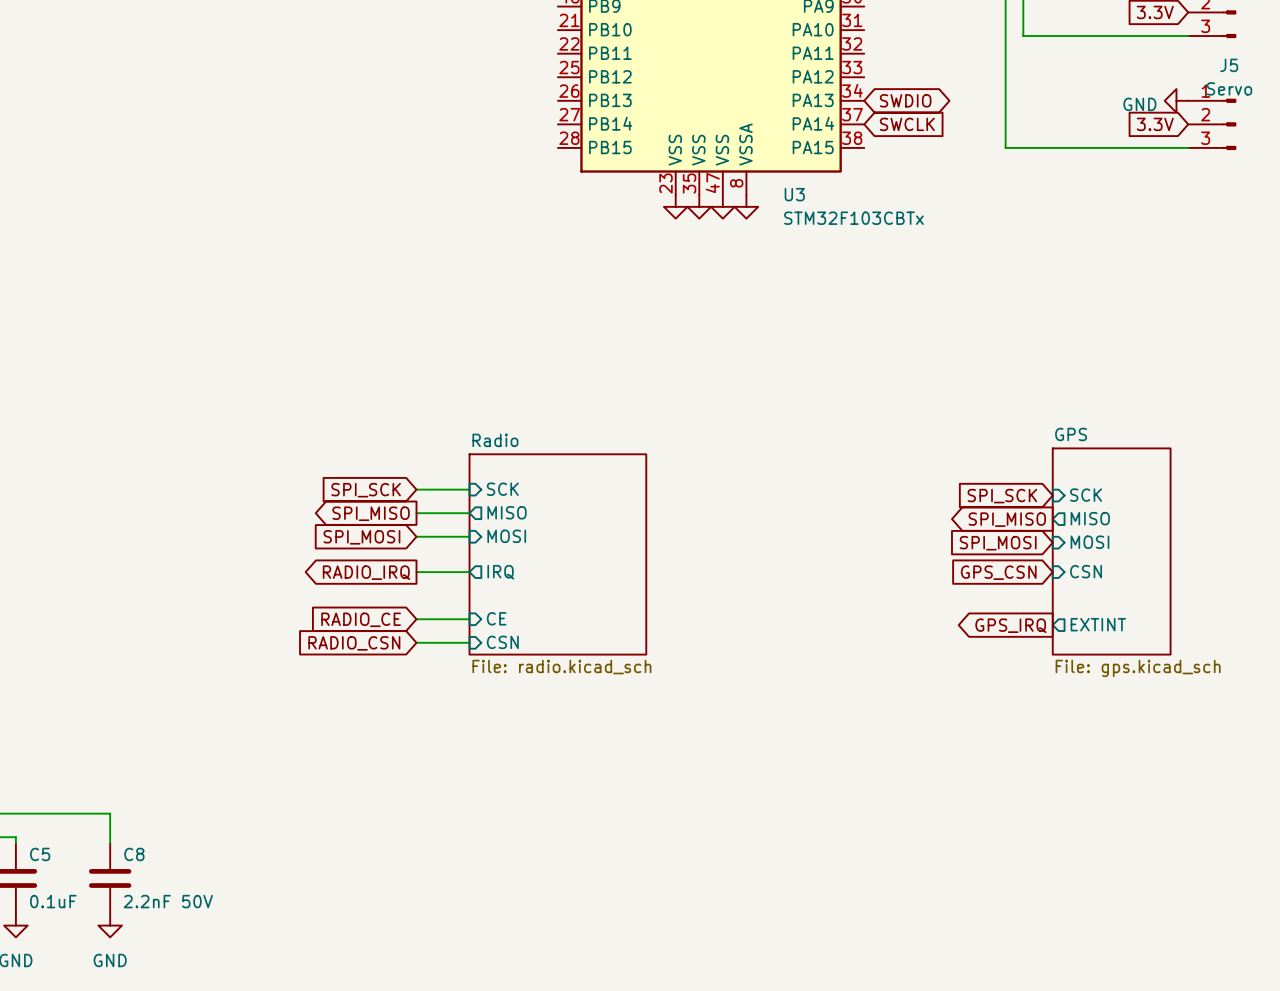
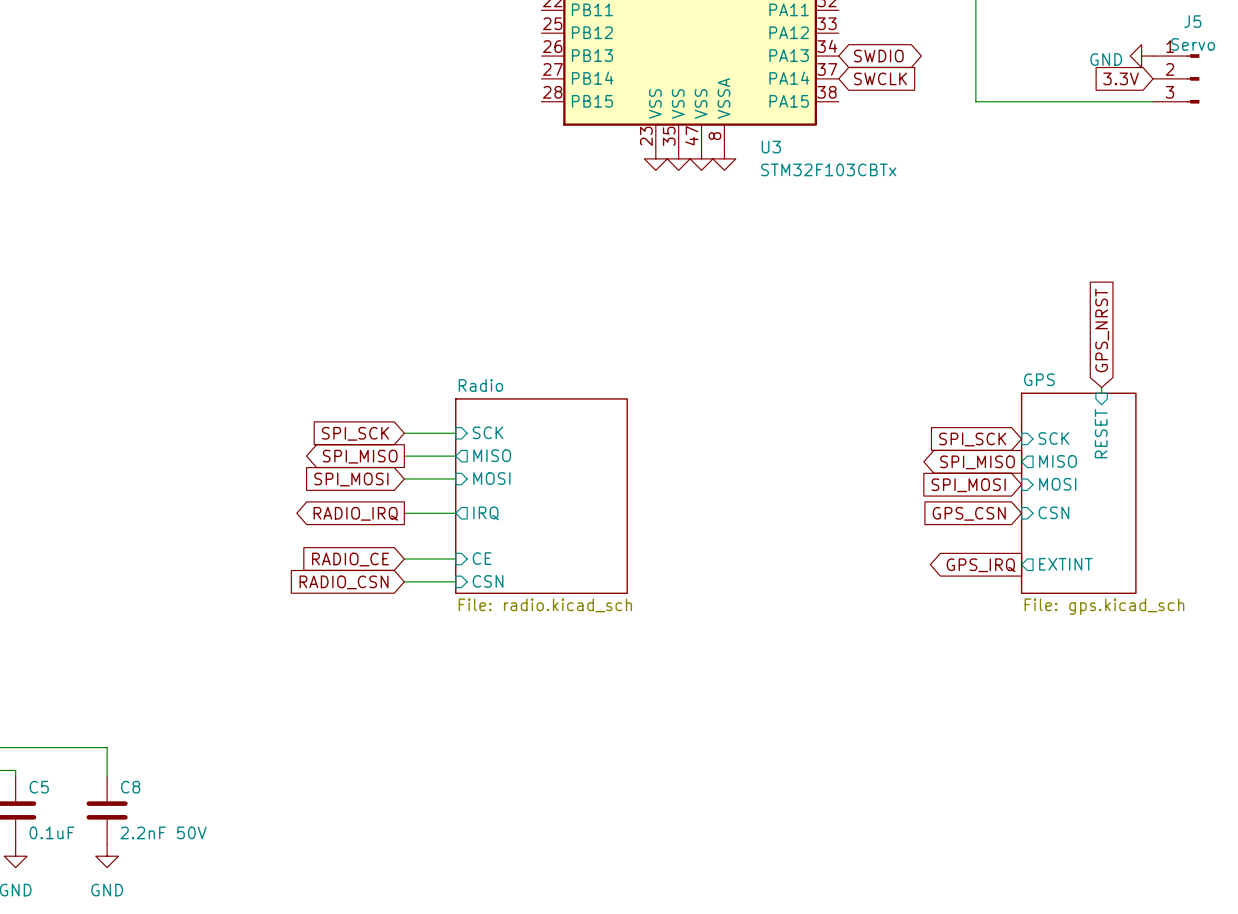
global label: none -> GPS_NRST (1102, 330)
wire: none -> (1101, 387) (1101, 393)
sheet pin: none -> RESET (1101, 433)

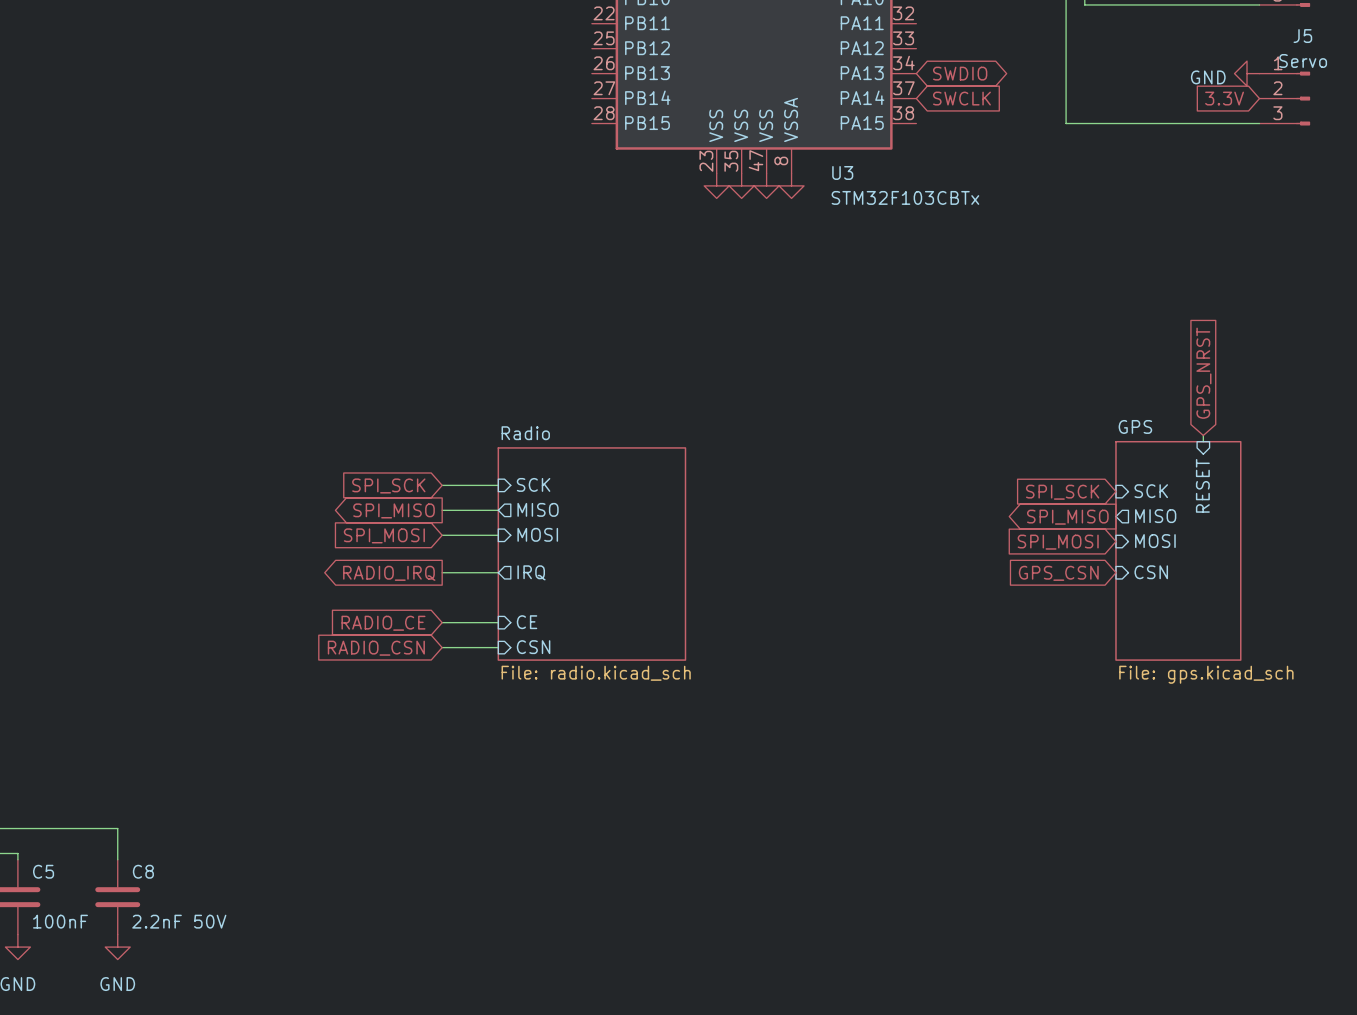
sheet pin: EXTINT (1065, 564) -> none
global label: GPS_IRQ (981, 565) -> none
C5 value: 0.1uF (51, 832) -> 100nF (60, 921)

